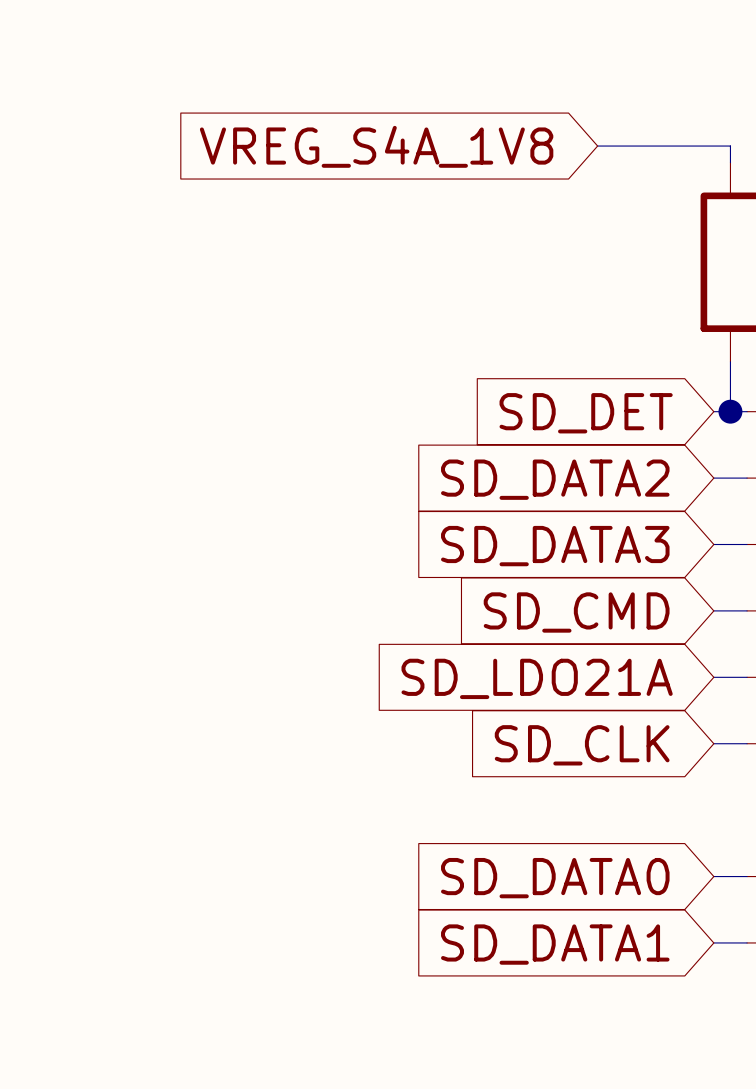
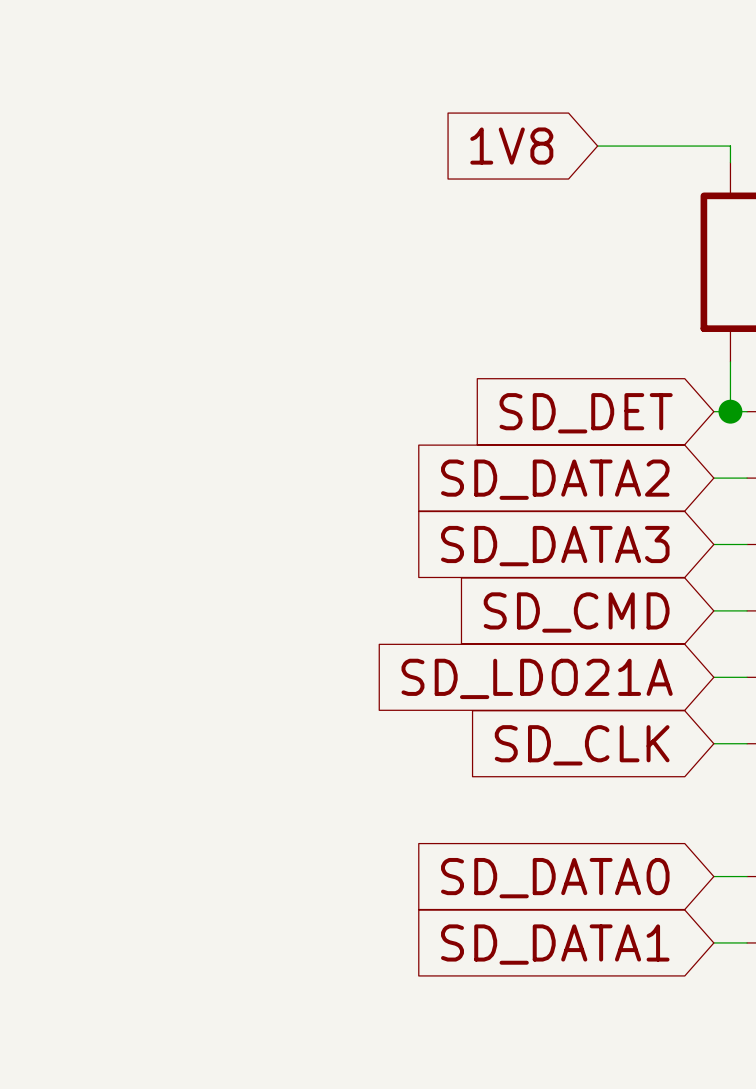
global label: VREG_S4A_1V8 (376, 146) -> 1V8 (511, 146)

